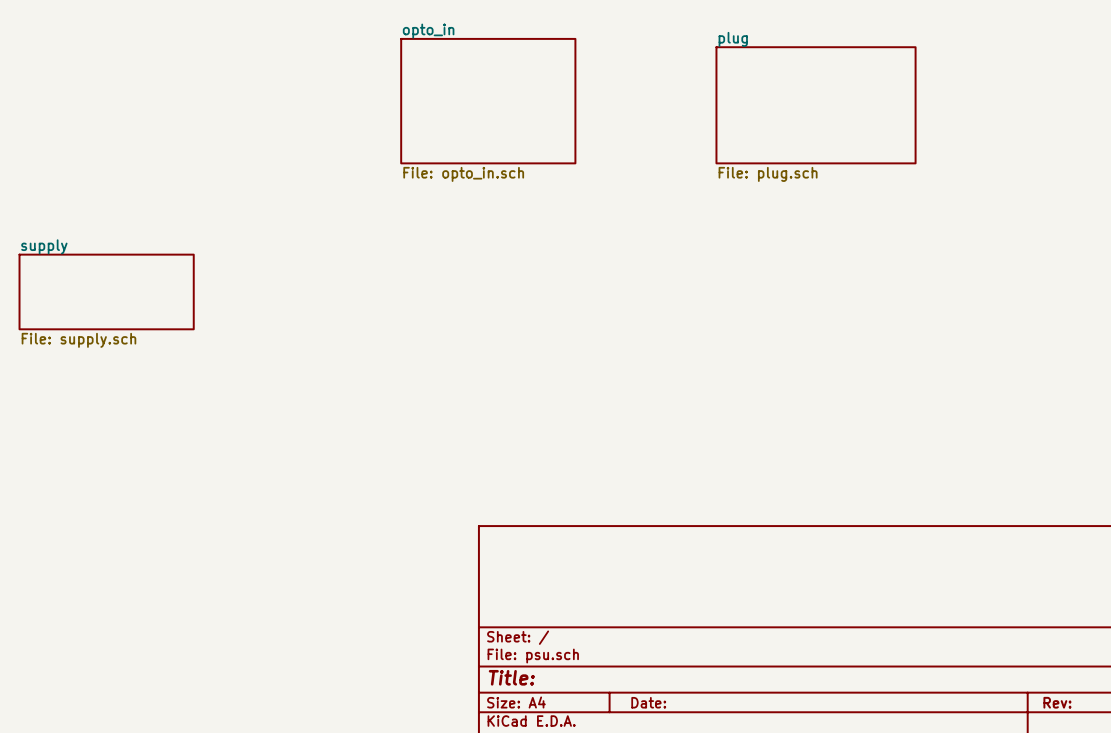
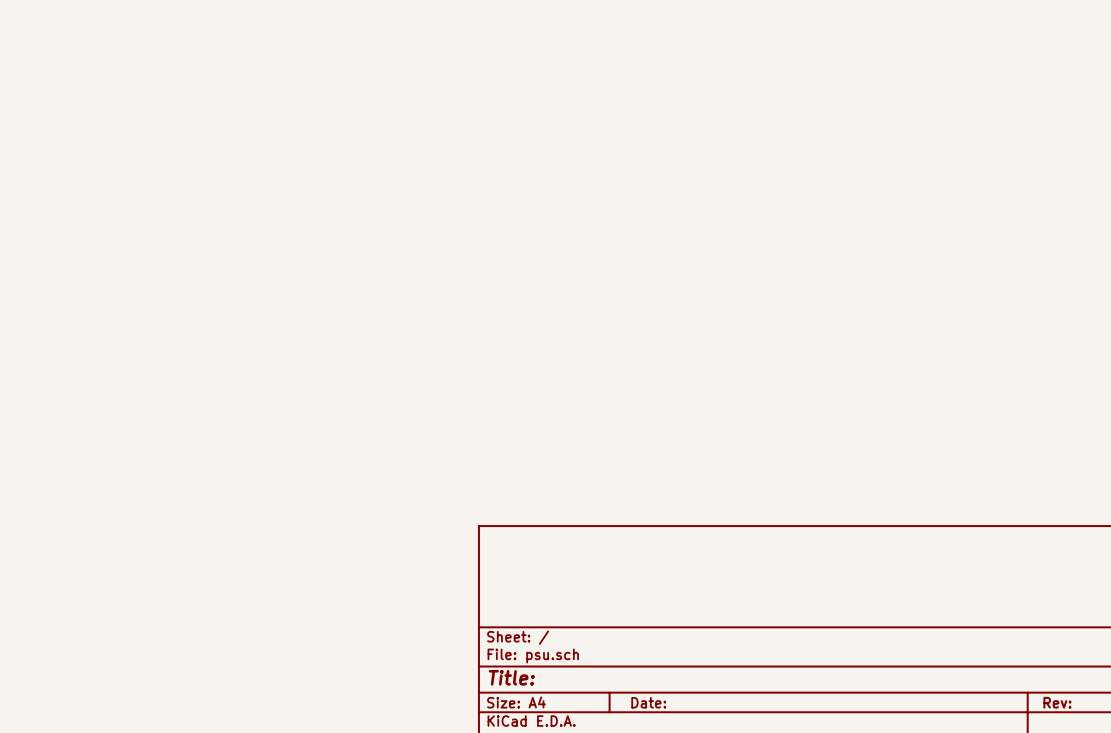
sheet opto_in: File: opto_in.sch (488, 101) -> none
sheet plug: File: plug.sch (816, 105) -> none
sheet supply: File: supply.sch (106, 291) -> none

